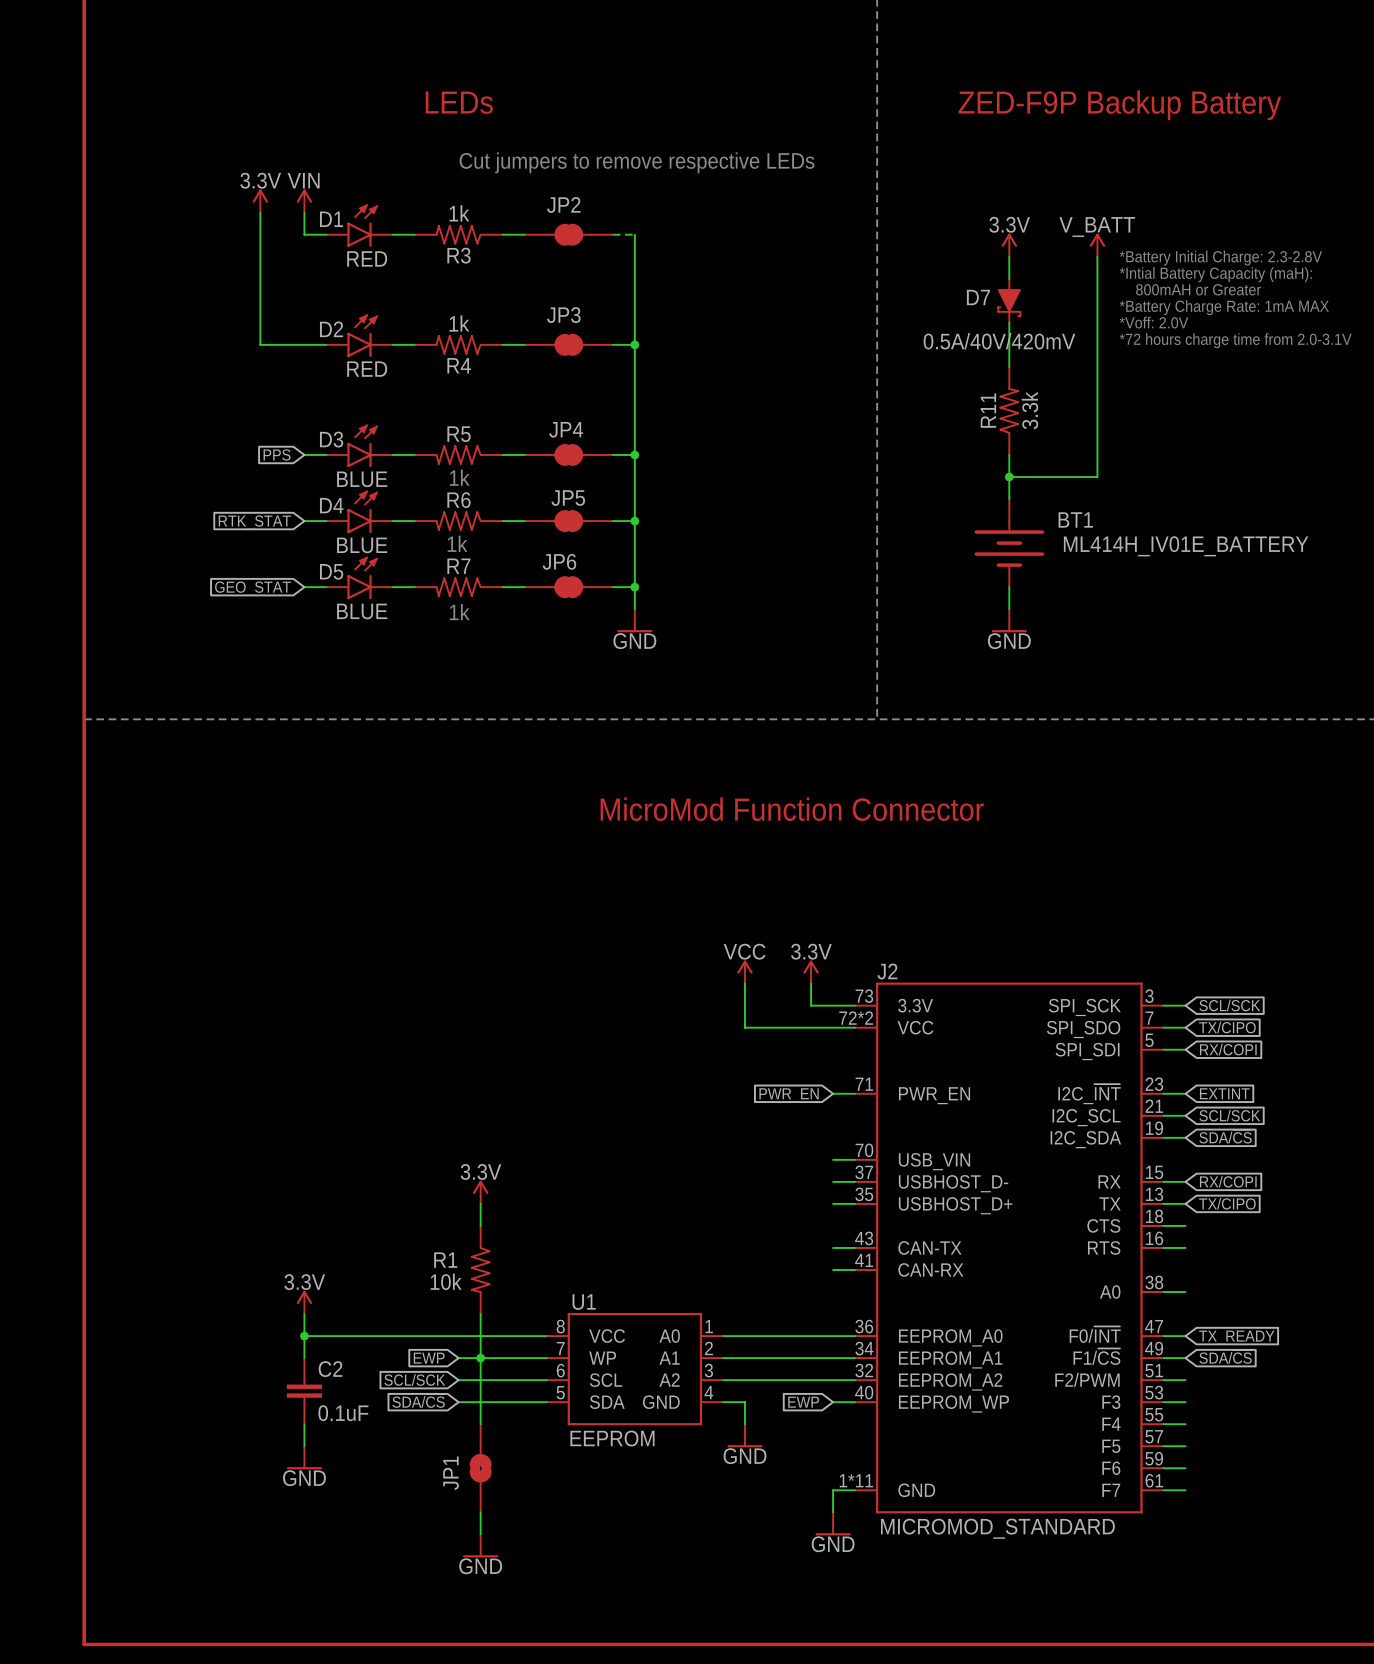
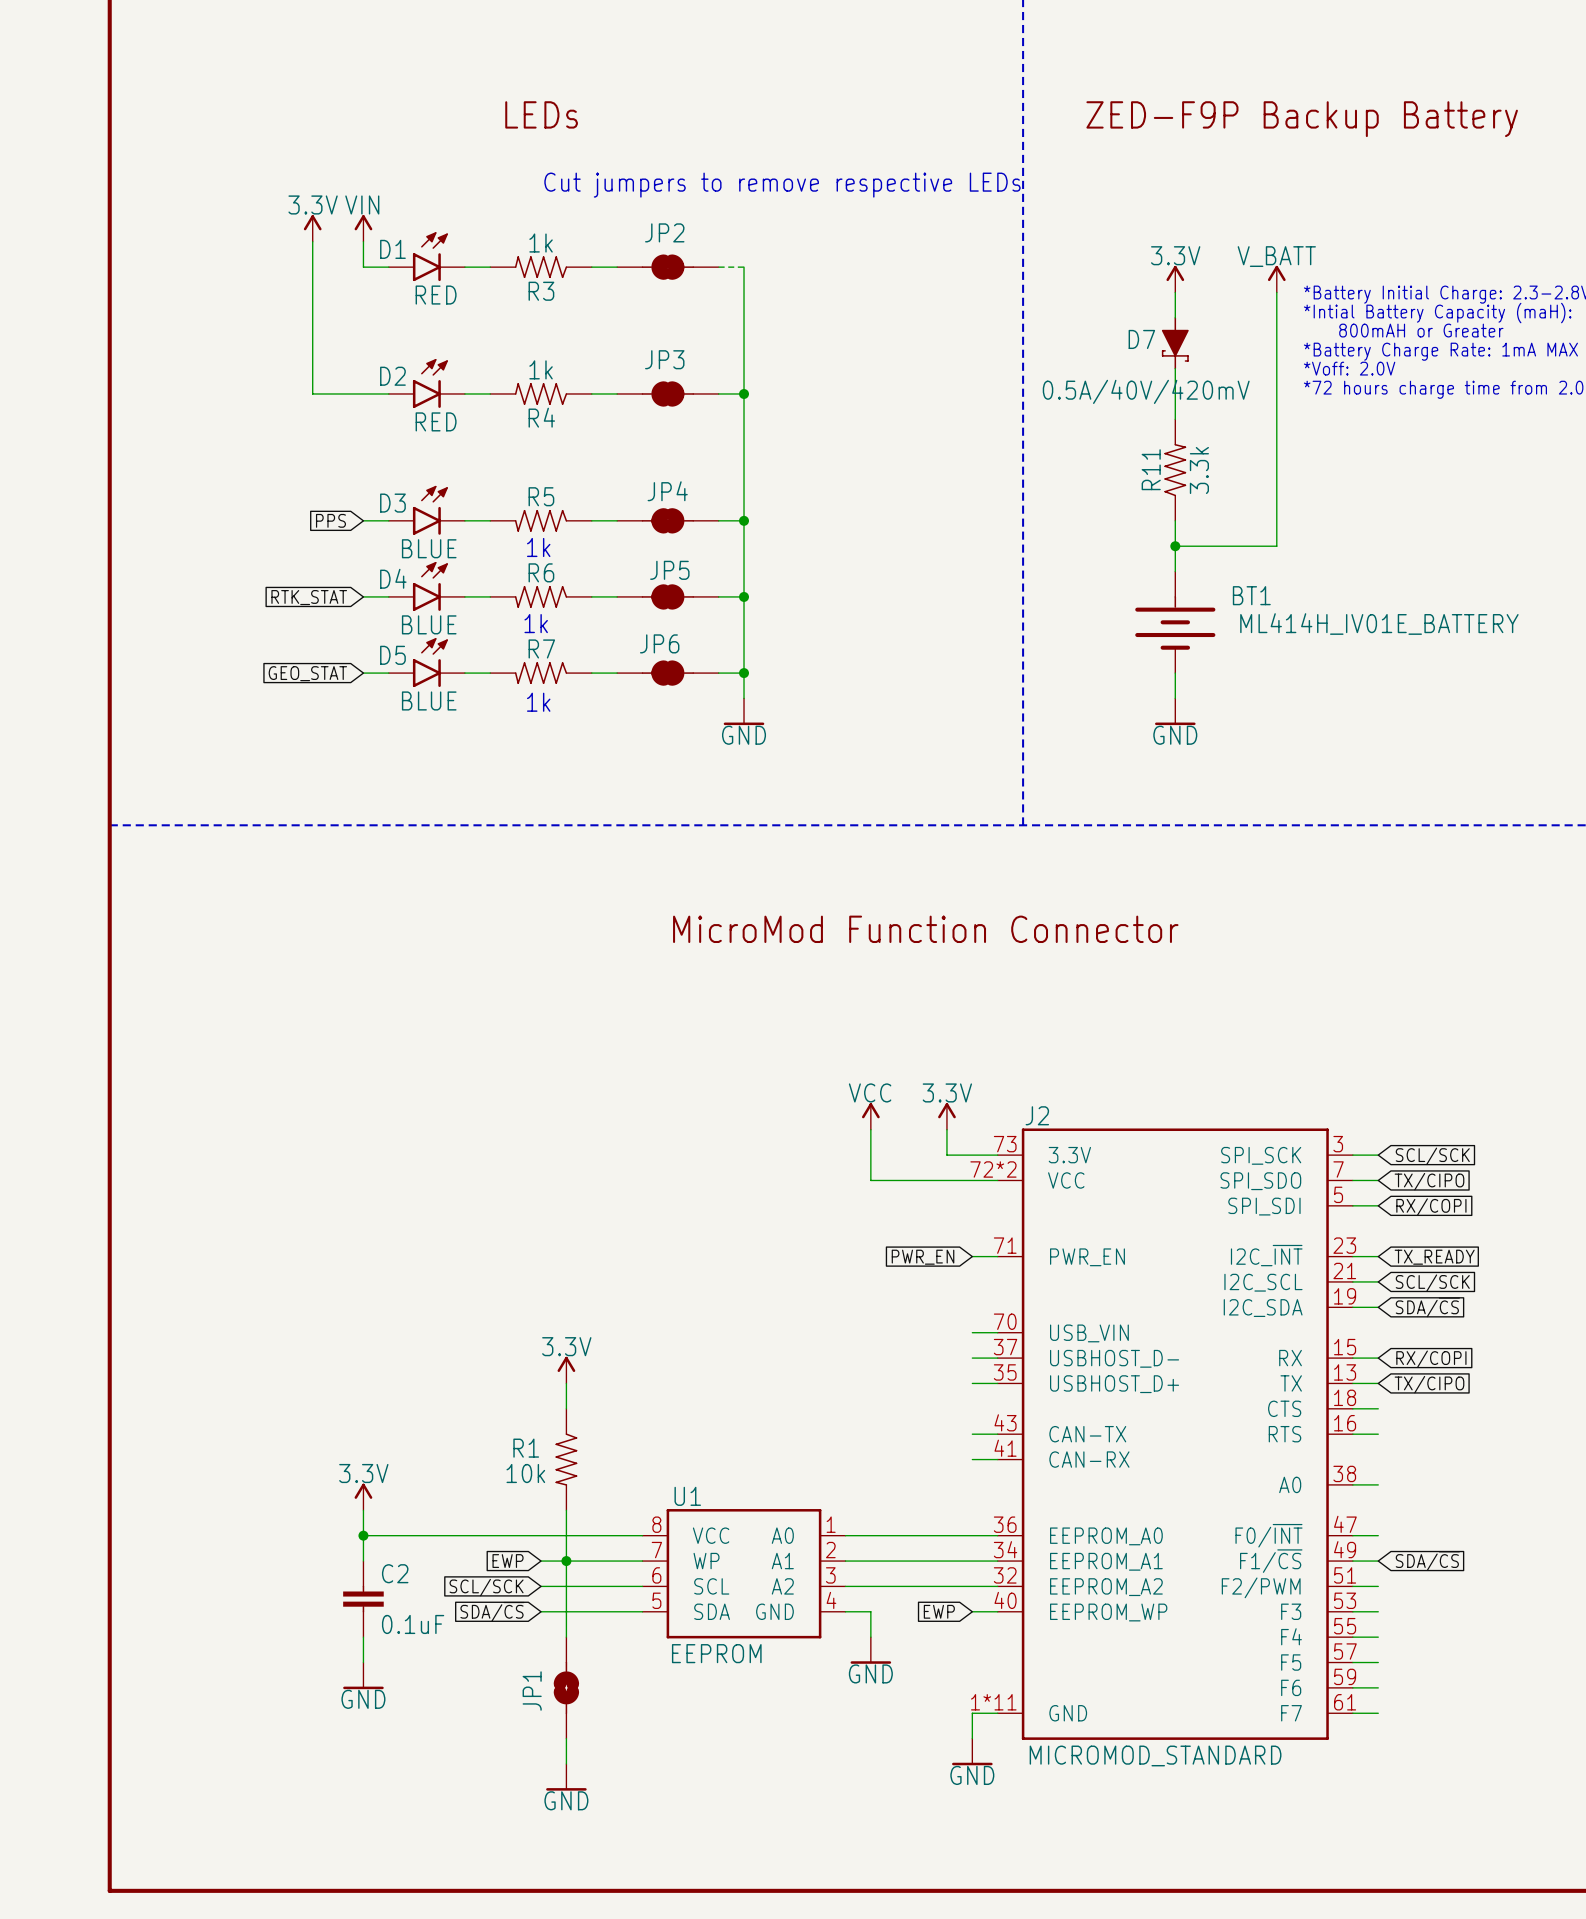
global label: EXTINT (1224, 1093) -> TX_READY (1434, 1257)
global label: TX_READY (1236, 1337) -> none

